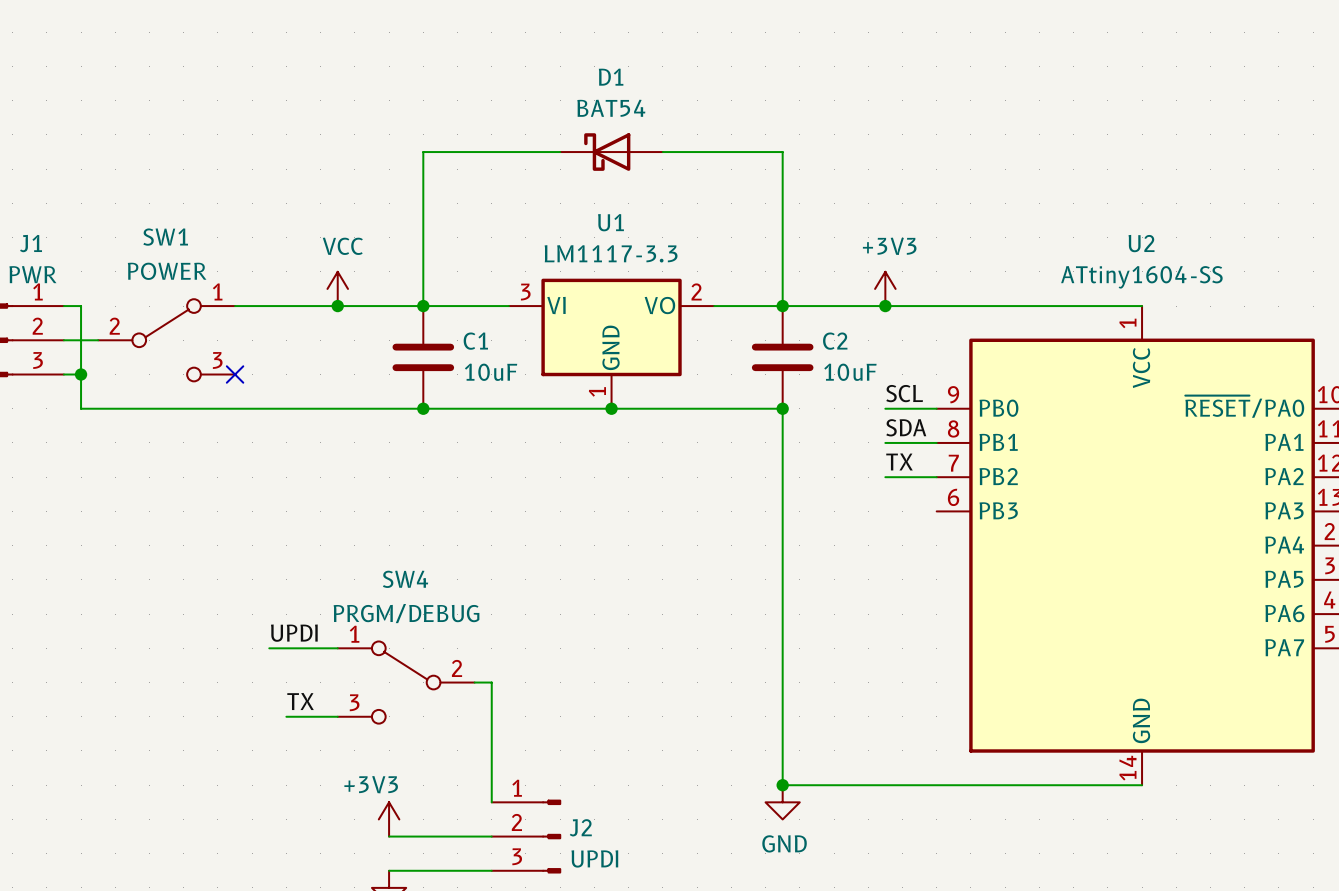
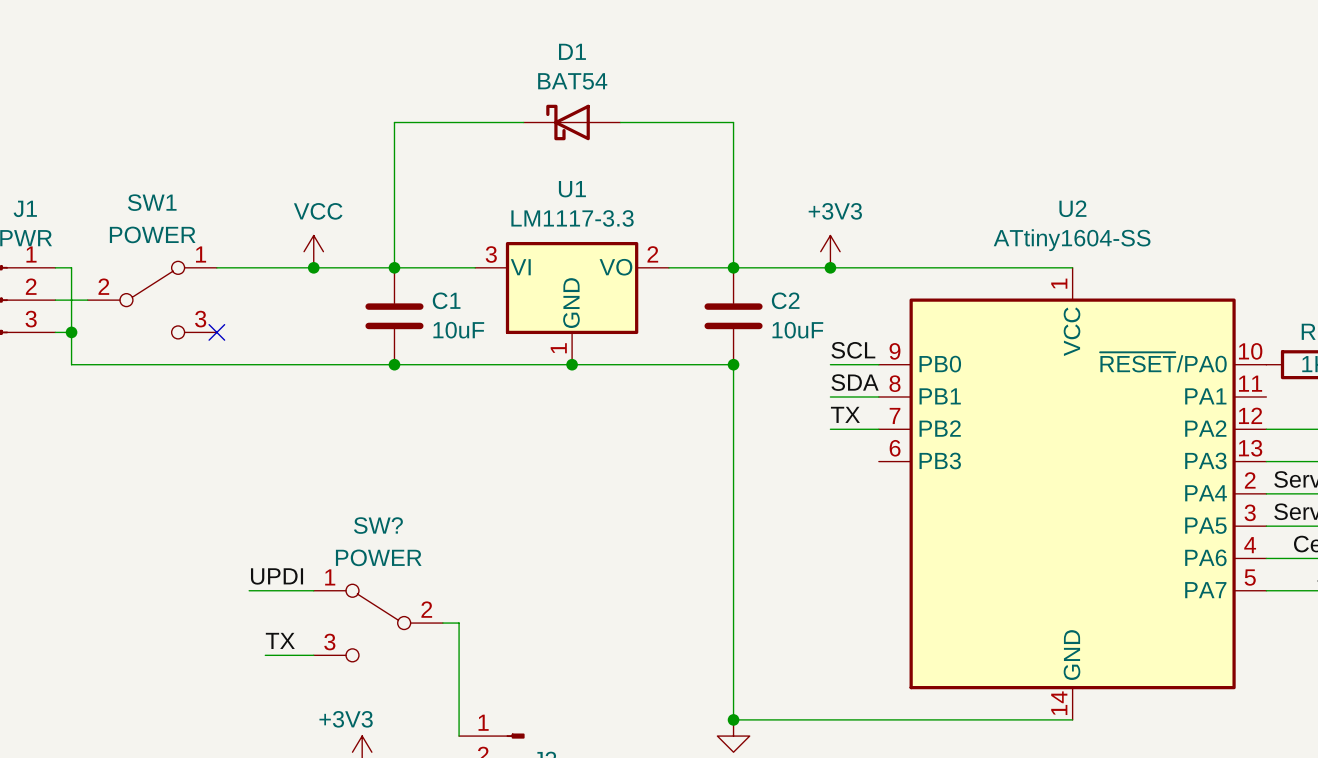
SW4 name: SW4 (405, 579) -> SW? (378, 525)
SW4 value: PRGM/DEBUG (406, 613) -> POWER (378, 557)

